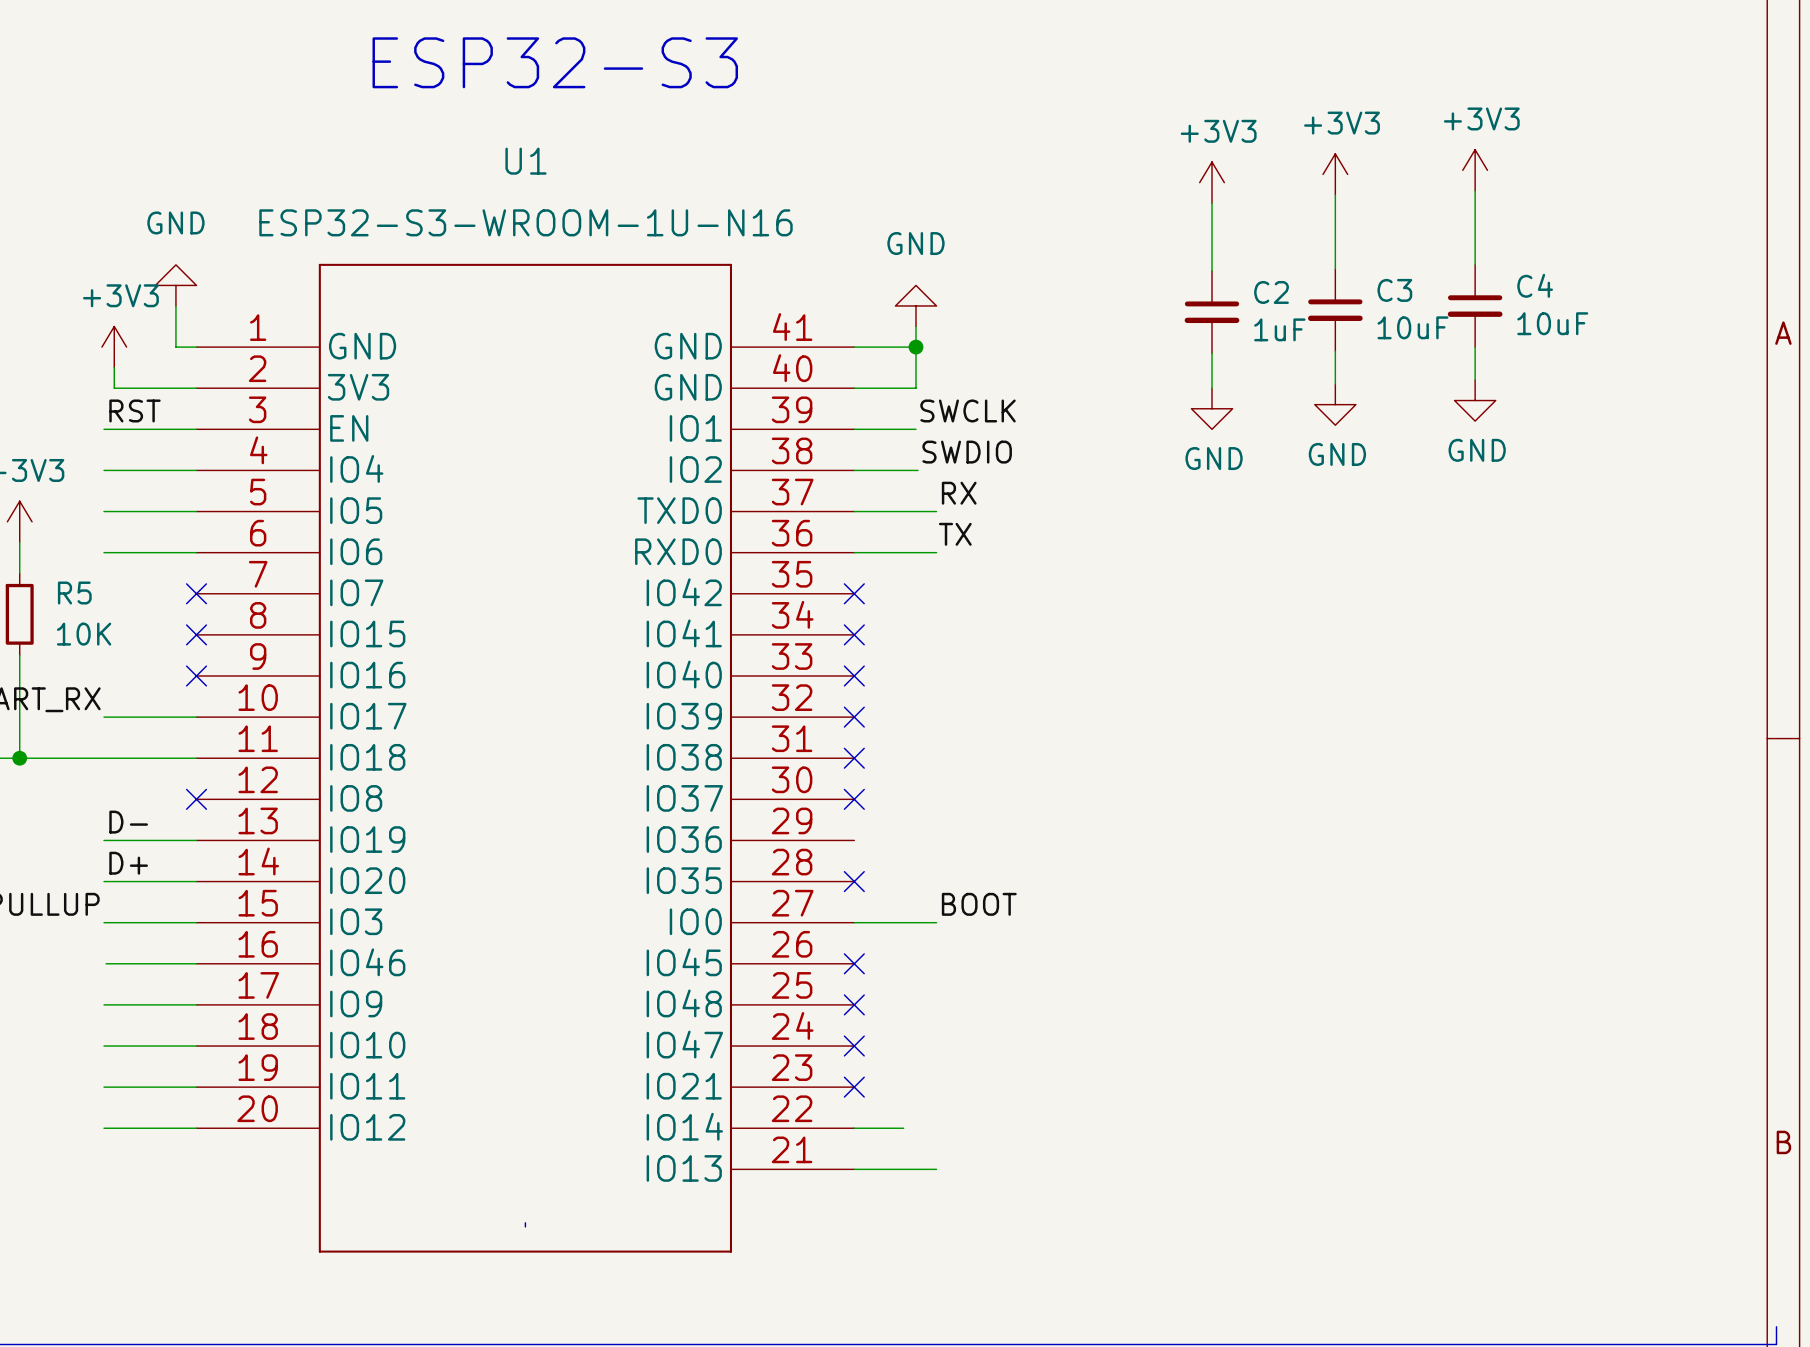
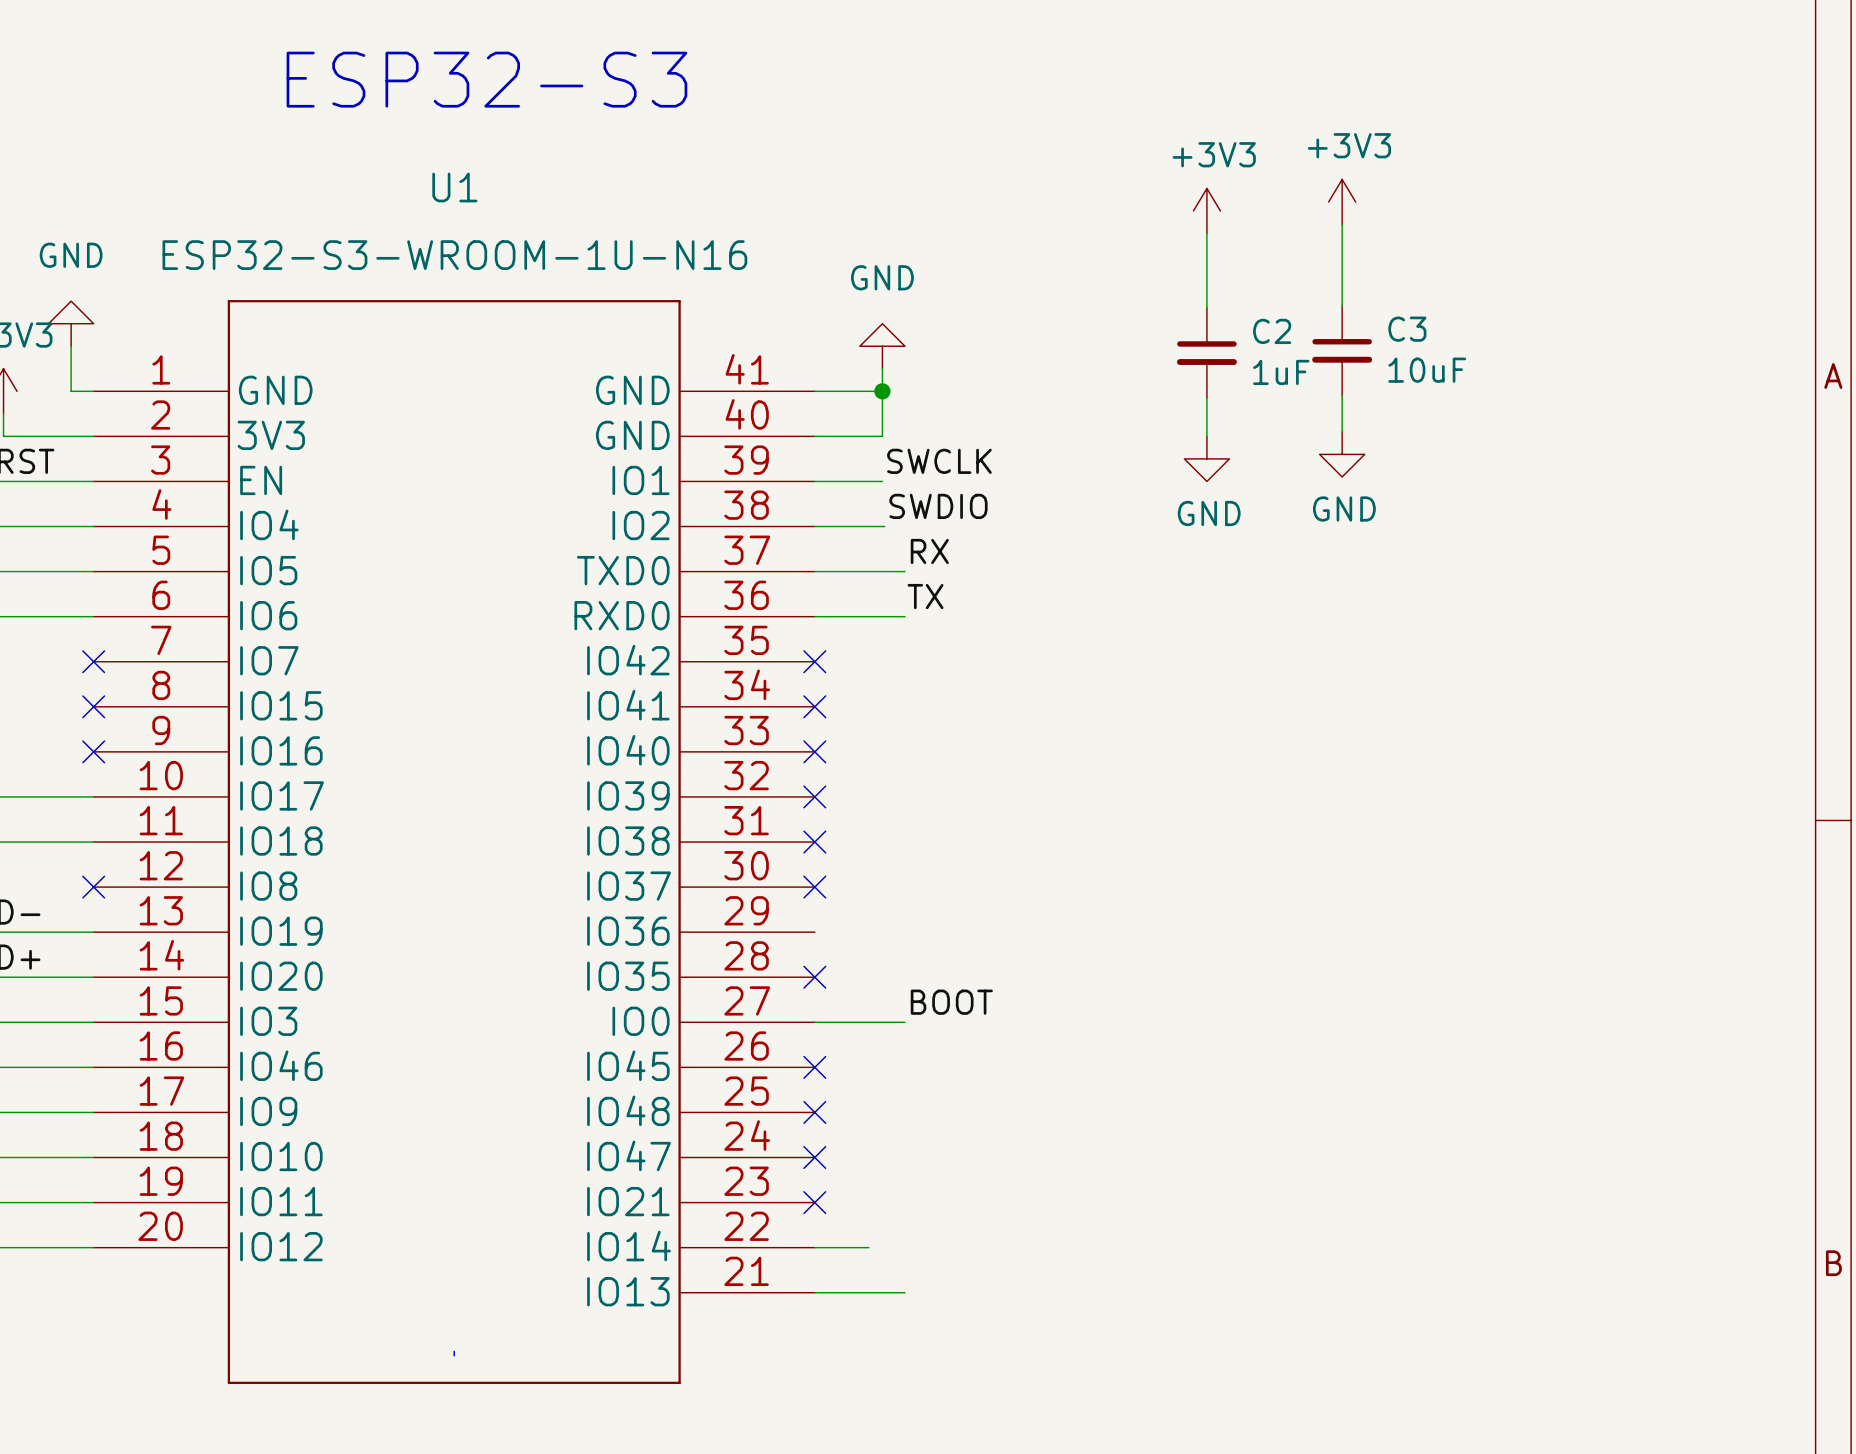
power symbol: +3V3 (1475, 170) -> none
wire: (1475, 190) (1475, 264) -> none
C4: 10uF (1475, 305) -> none
wire: (1475, 347) (1475, 379) -> none
power symbol: GND (1475, 400) -> none

